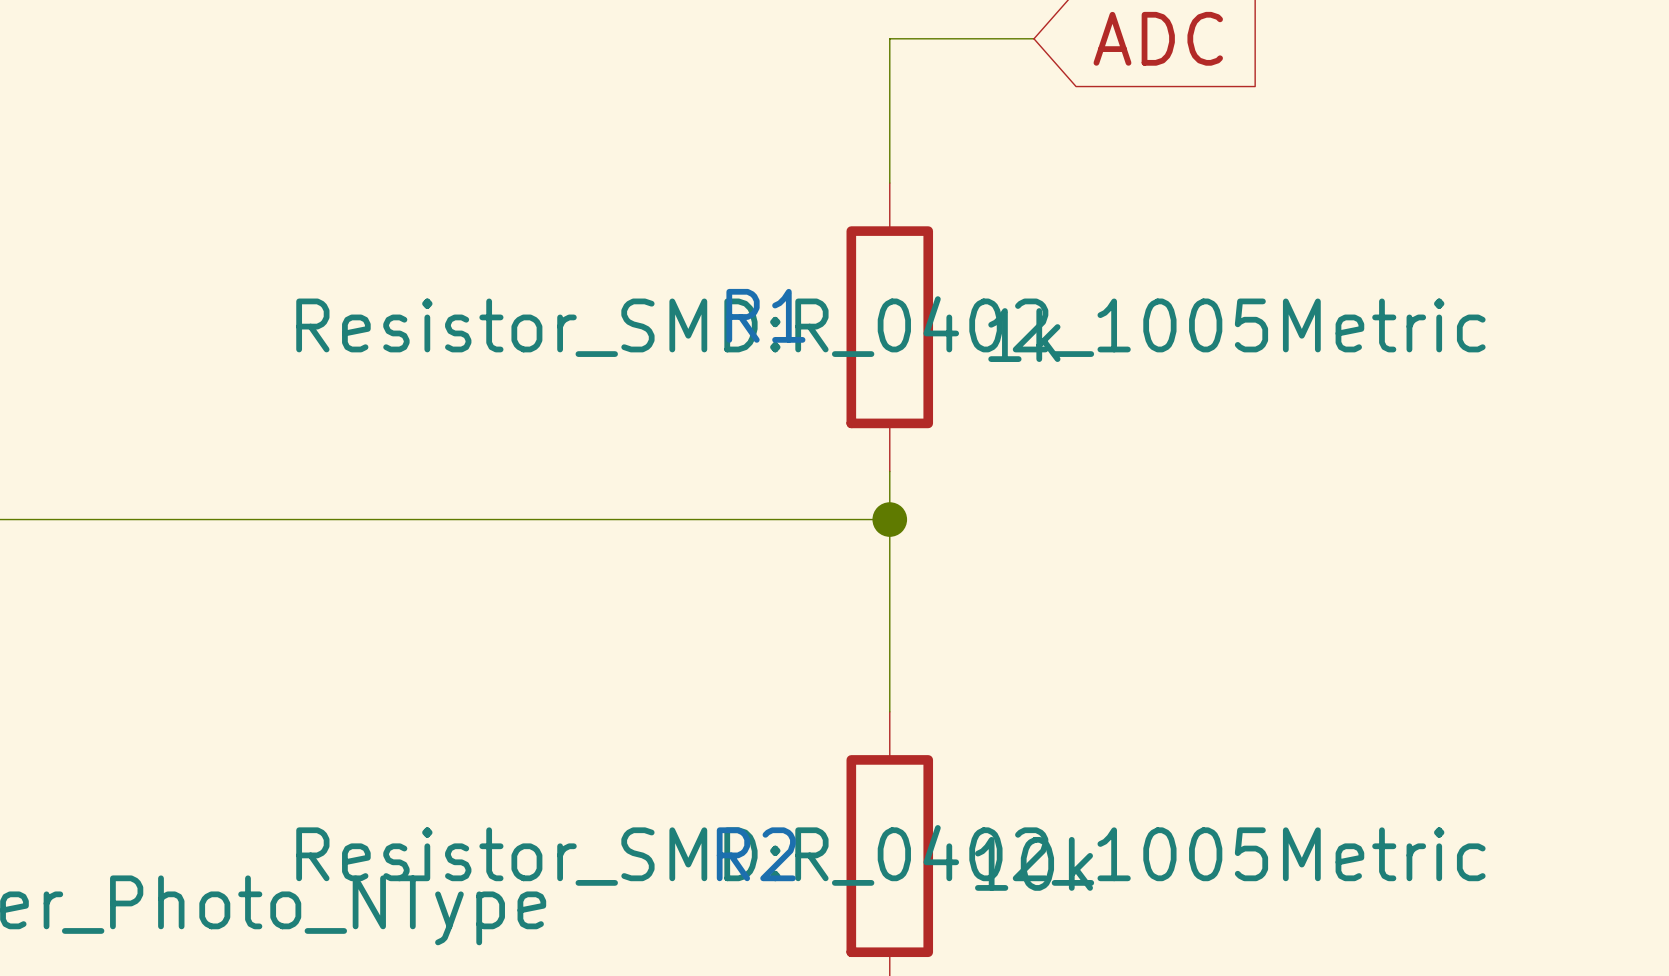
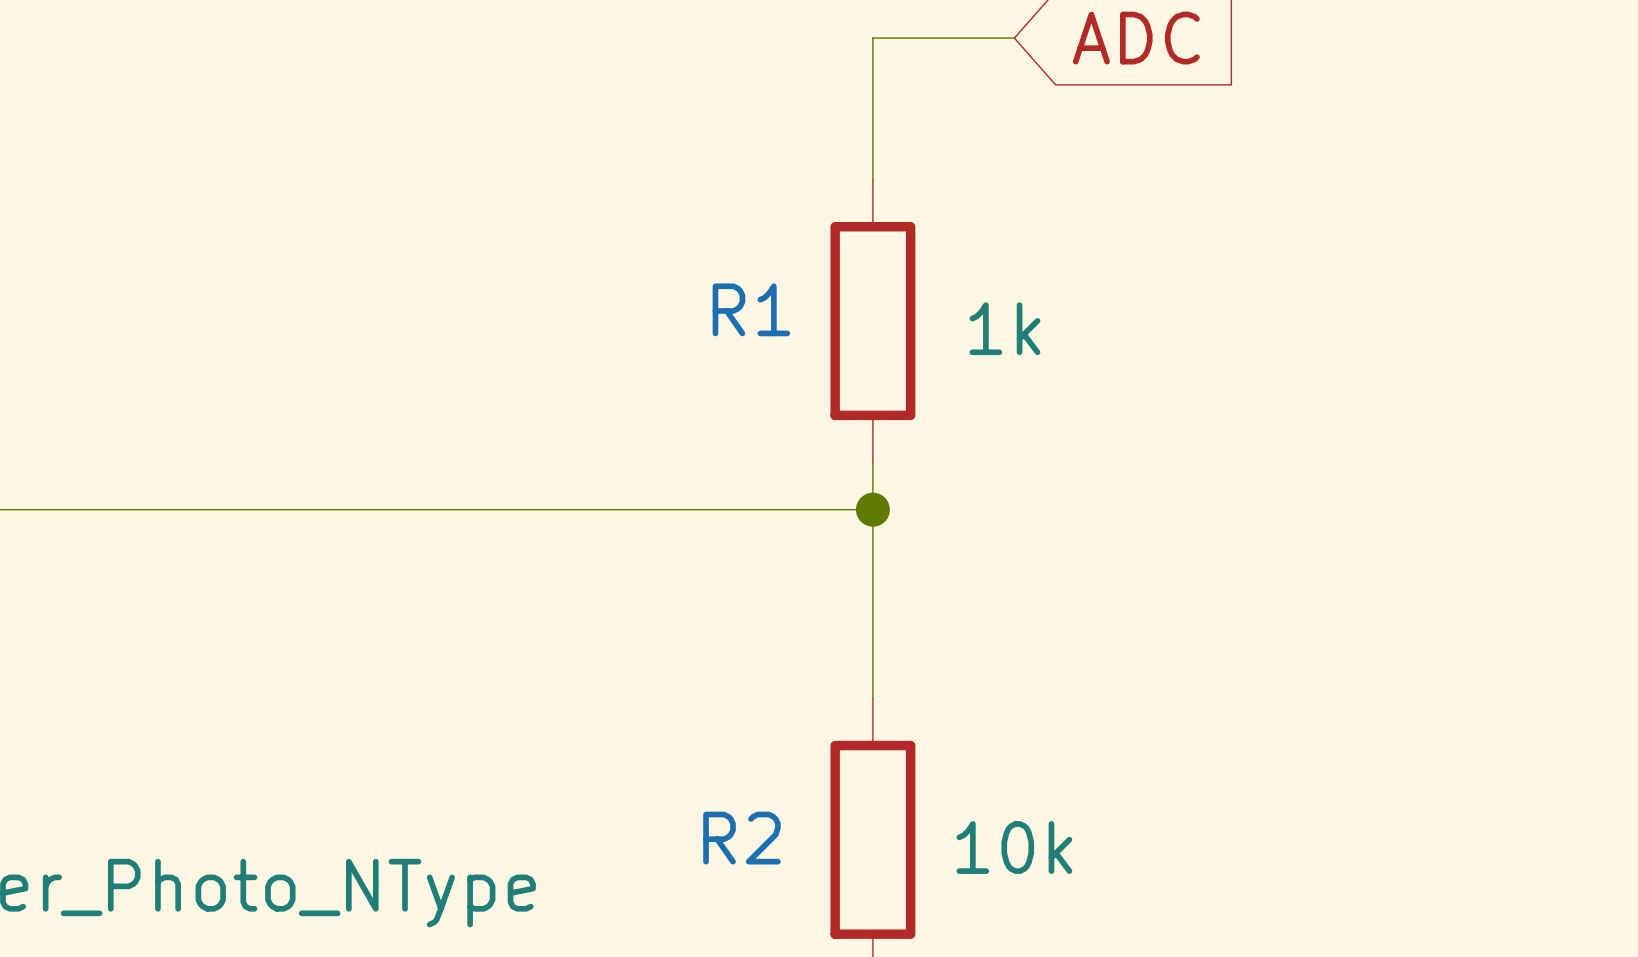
R1 text: Resistor_SMD:R_0402_1005Metric (890, 326) -> none
R2 text: Resistor_SMD:R_0402_1005Metric (890, 855) -> none

